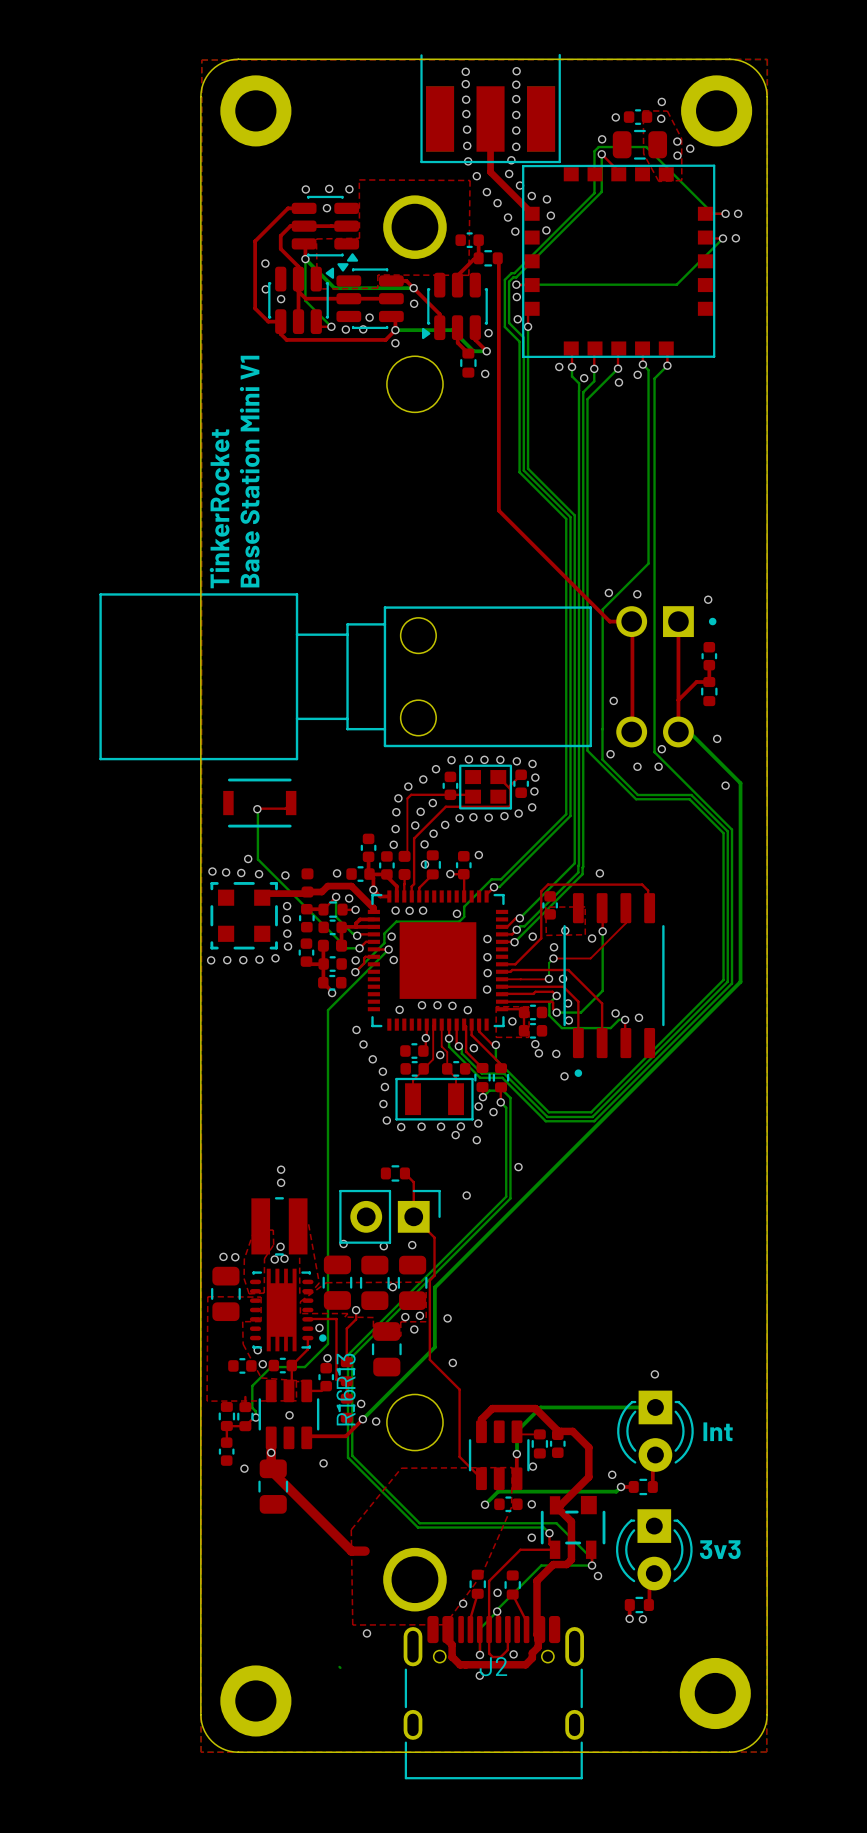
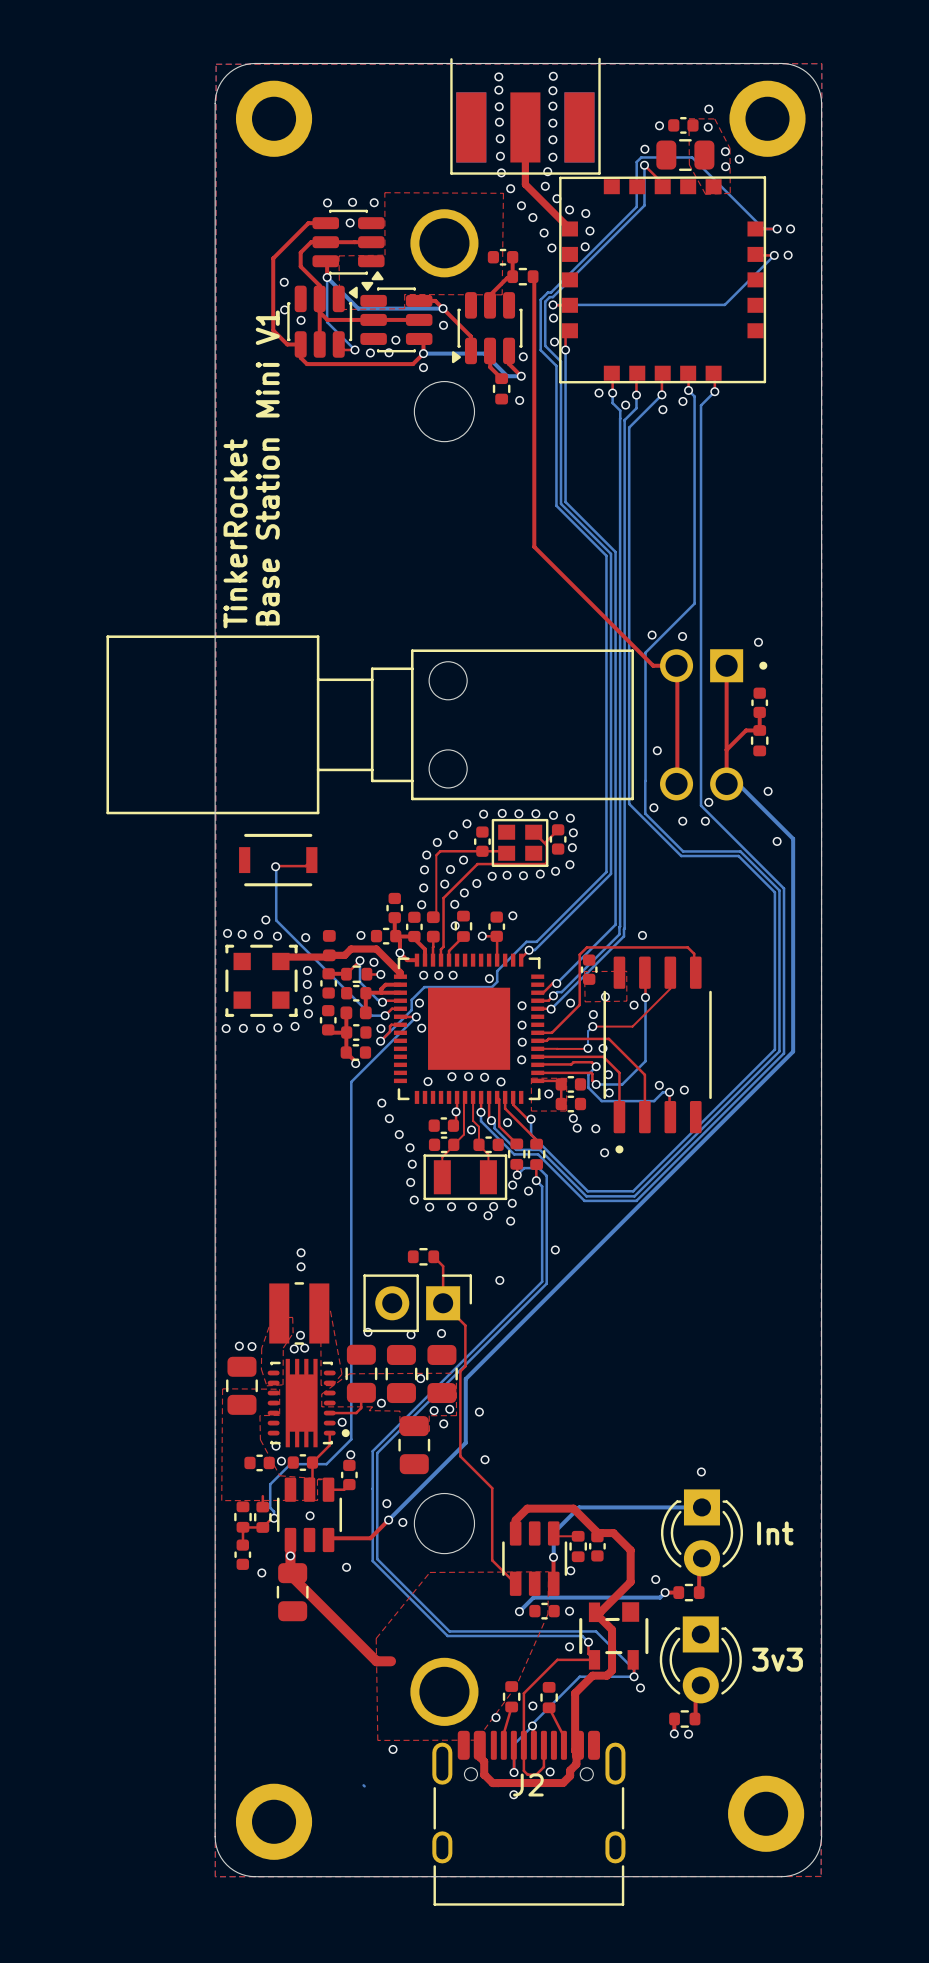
top track: (356, 1310) (356, 1319) (346, 1328) (346, 1362) -> none
top track: (307, 1318) (336, 1318) (336, 1379) (346, 1381) (346, 1398) -> (329, 1413) (356, 1413) (361, 1408) (361, 1393)
R13: (346, 1371) -> none
R16: (346, 1408) -> none

